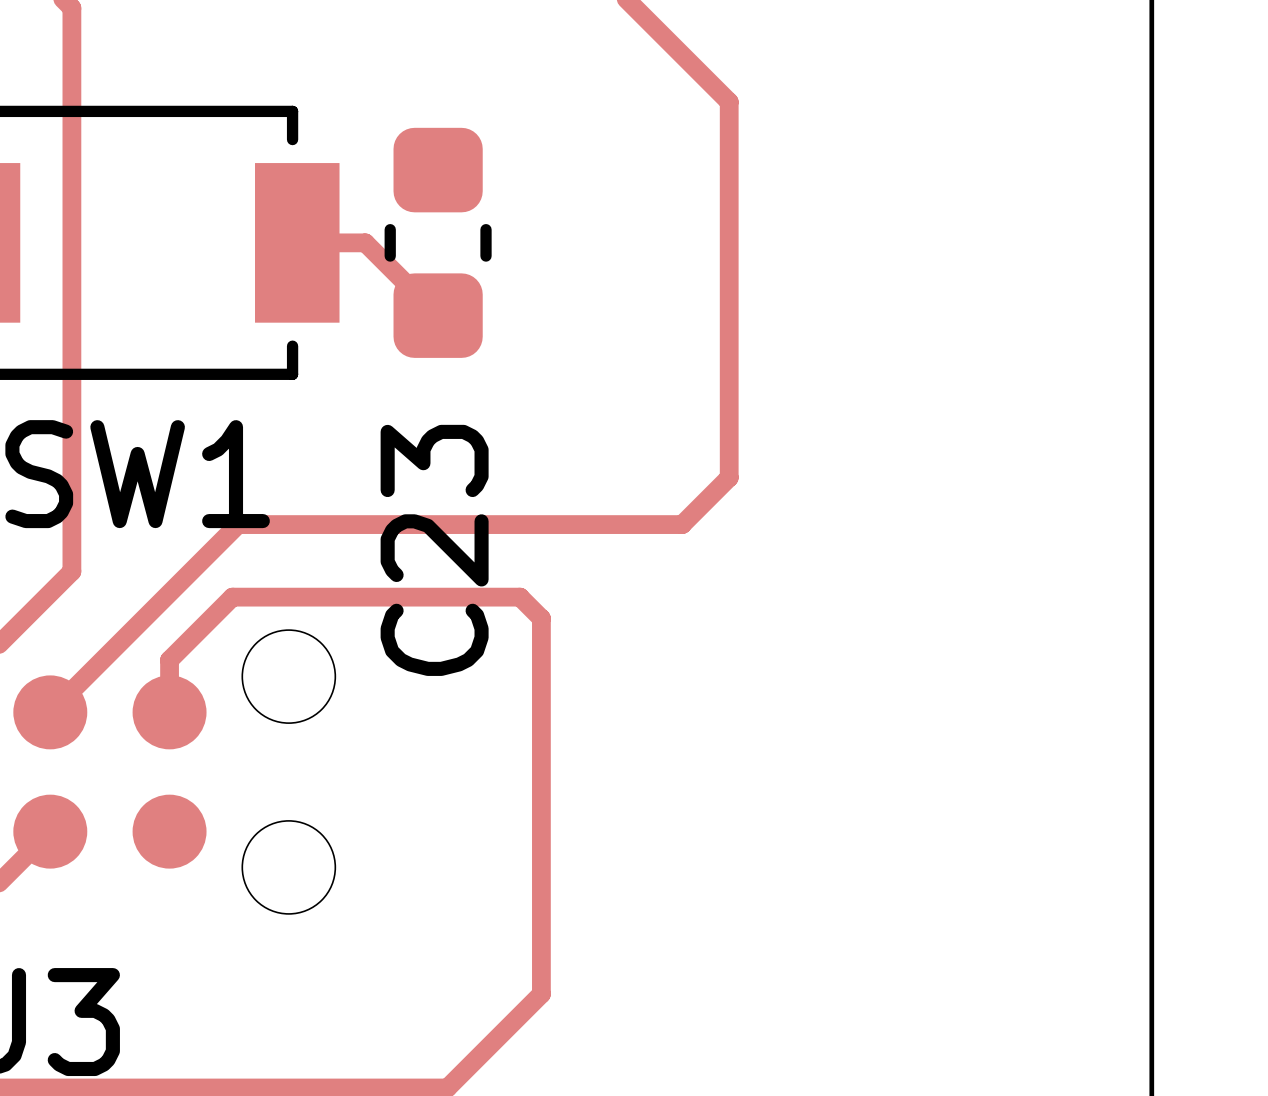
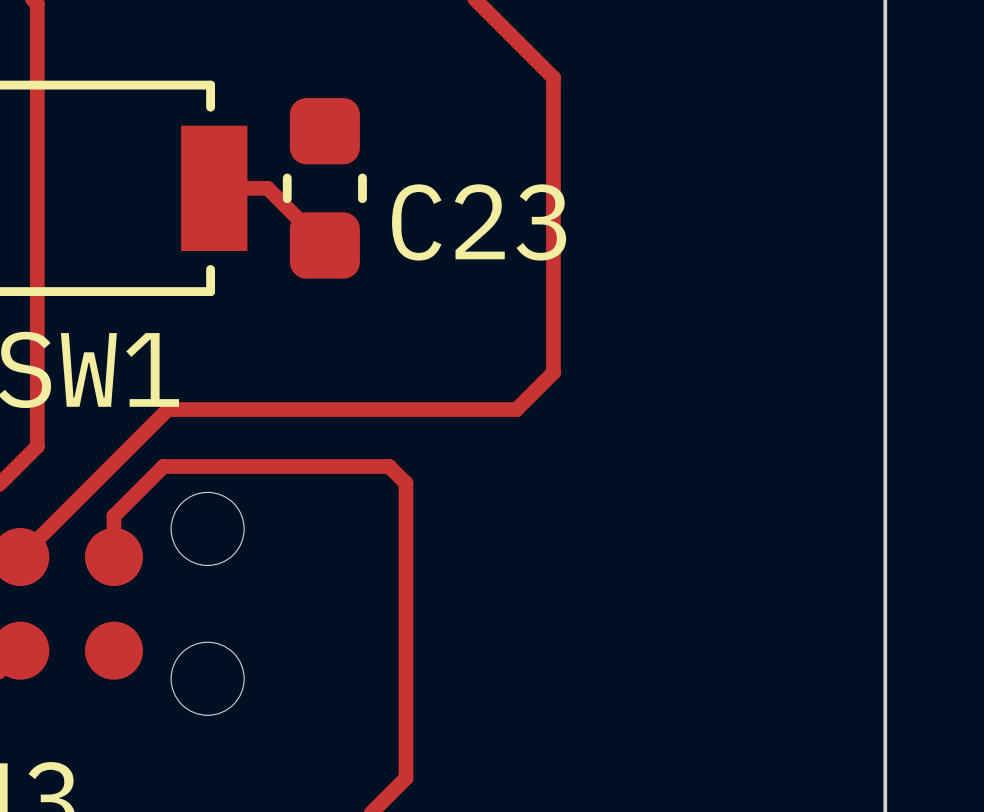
C23 name rotation: 0° (434, 550) -> 90° clockwise (479, 222)

